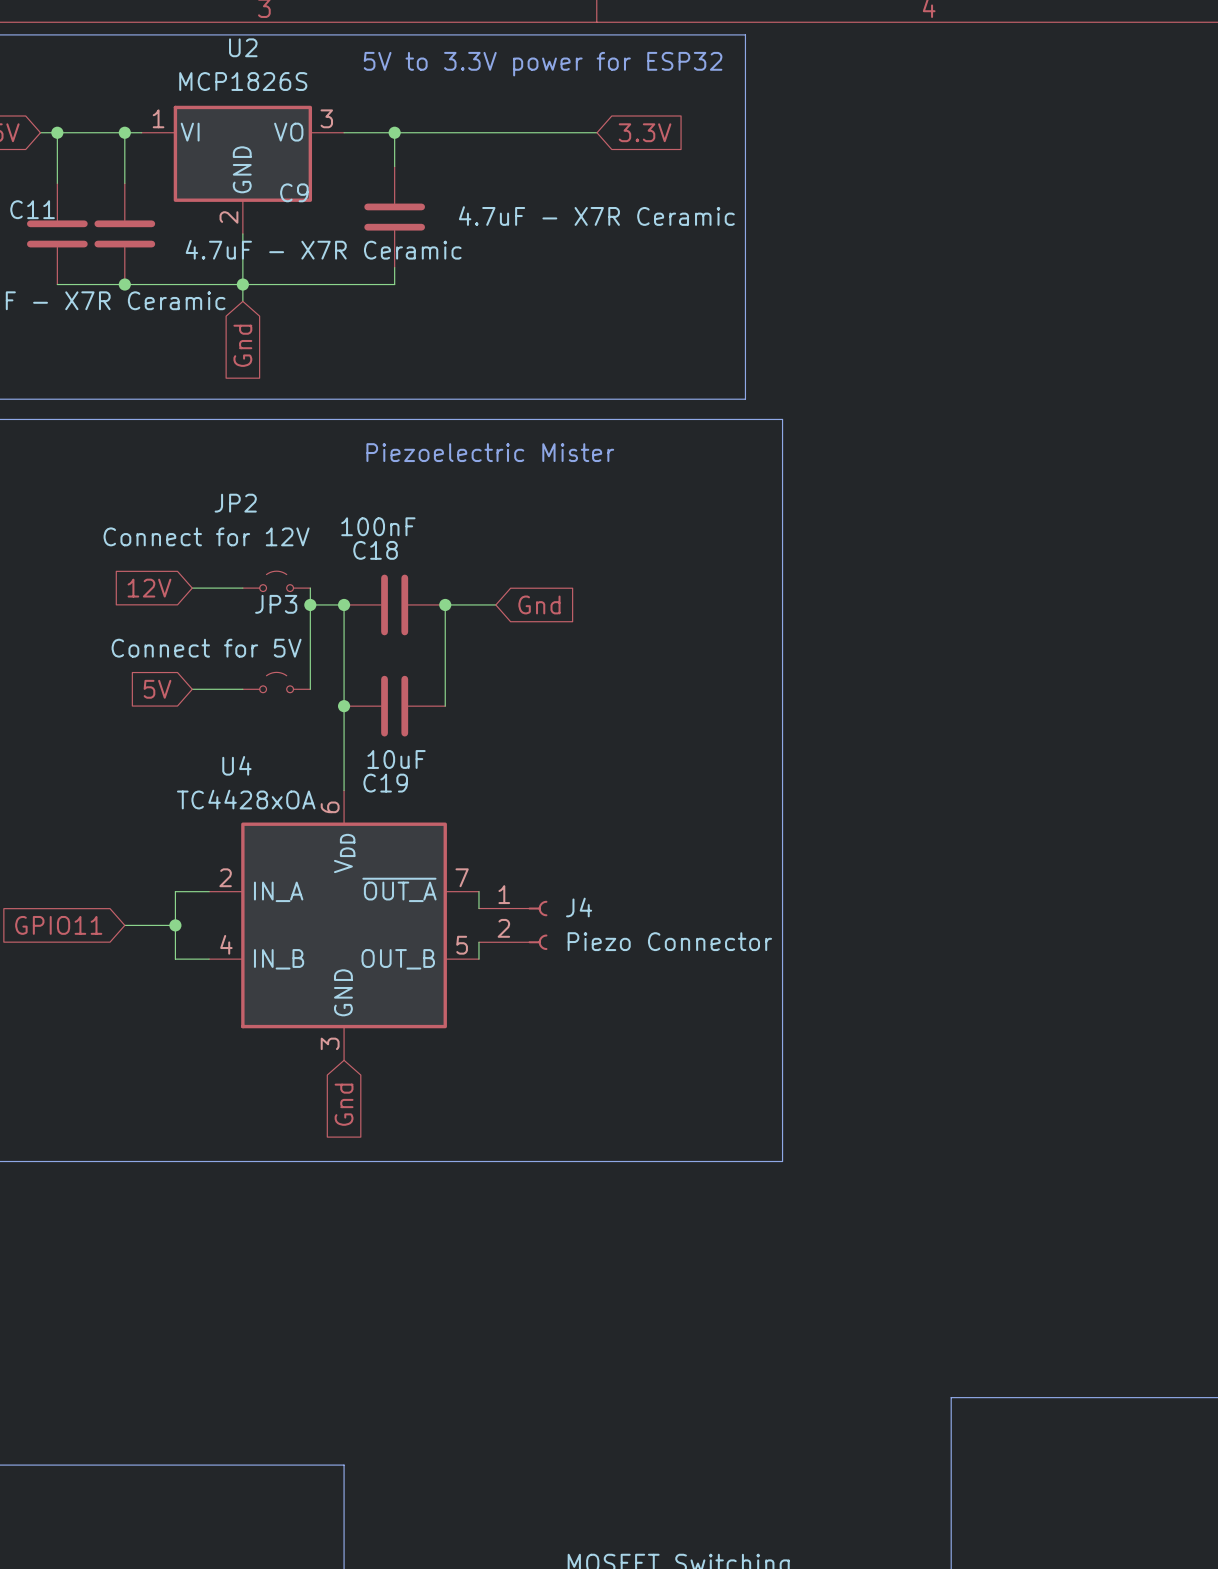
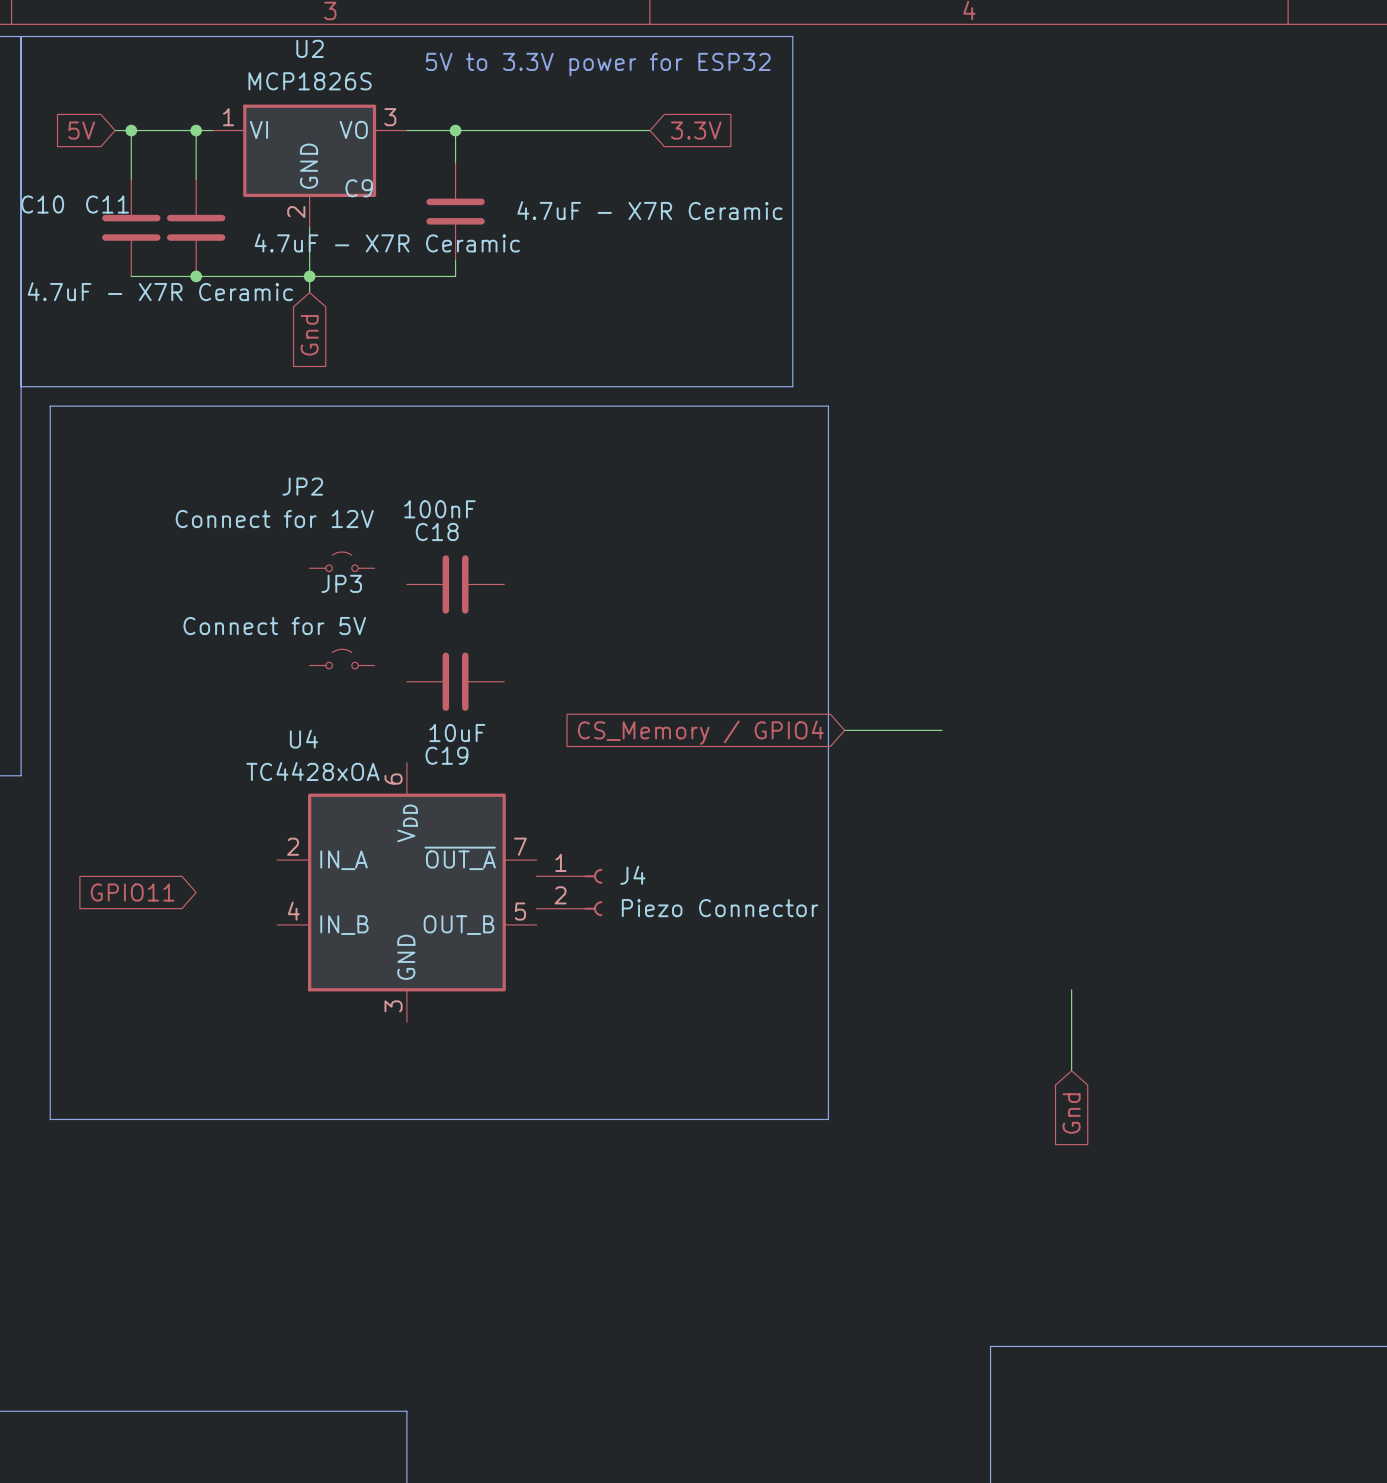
text: Piezoelectric Mister (490, 452) -> none
global label: 12V (149, 588) -> none
wire: (192, 588) (242, 588) -> none
wire: (310, 588) (310, 689) -> none
wire: (310, 604) (344, 604) (344, 790) -> none
junction: (310, 604) -> none
junction: (344, 604) -> none
junction: (445, 604) -> none
wire: (495, 604) (445, 604) (445, 706) -> none
global label: Gnd (539, 604) -> none
global label: 5V (157, 689) -> none
wire: (192, 689) (242, 689) -> none
junction: (344, 706) -> none
wire: none -> (844, 730) (941, 730)
global label: none -> CS_Memory / GPIO4 (700, 732)
wire: (209, 891) (175, 891) (175, 959) (209, 959) -> none
wire: (478, 891) (478, 908) -> none
wire: (124, 925) (175, 925) -> none
junction: (175, 925) -> none
wire: (478, 942) (478, 959) -> none
wire: none -> (1071, 989) (1071, 1070)
global label: Gnd (344, 1104) -> none
global label: none -> Gnd (1071, 1113)

